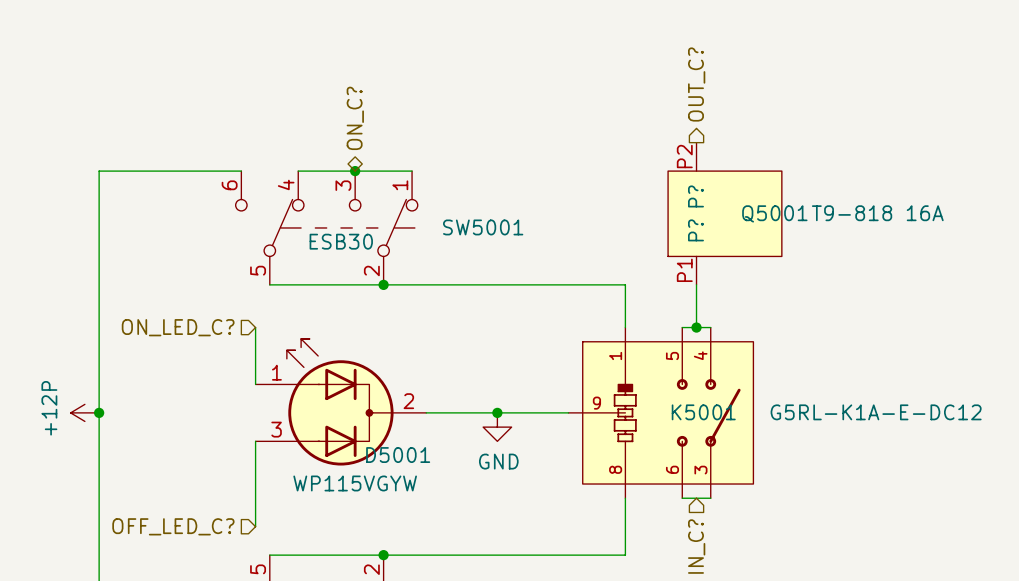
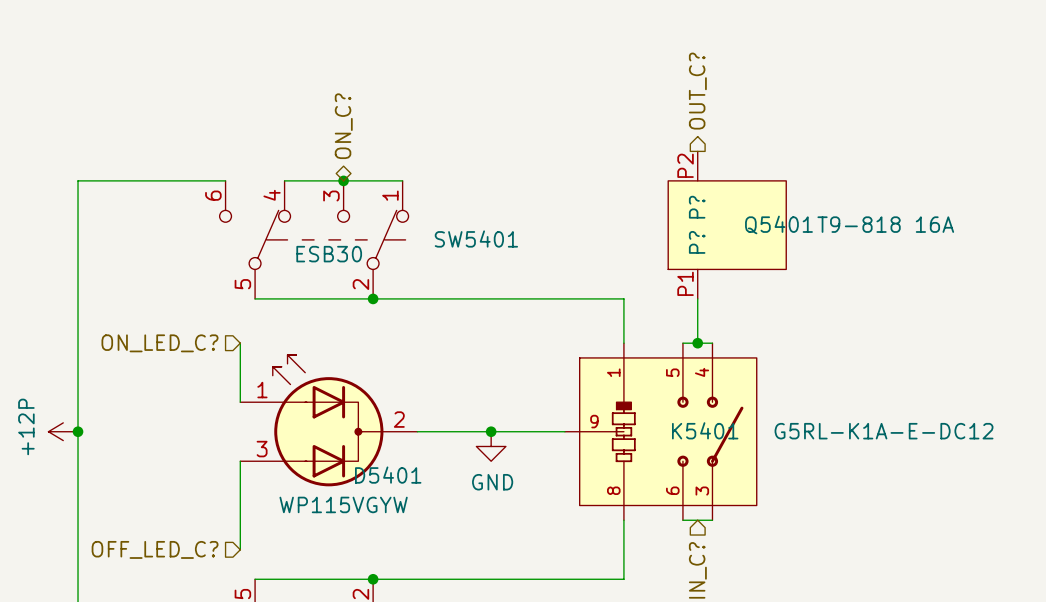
Q5001 name: Q5001 (774, 213) -> Q5401 (778, 224)
SW5001 name: SW5001 (483, 227) -> SW5401 (476, 239)
K5001 name: K5001 (703, 412) -> K5401 (705, 430)
D5001 name: D5001 (398, 455) -> D5401 (388, 475)

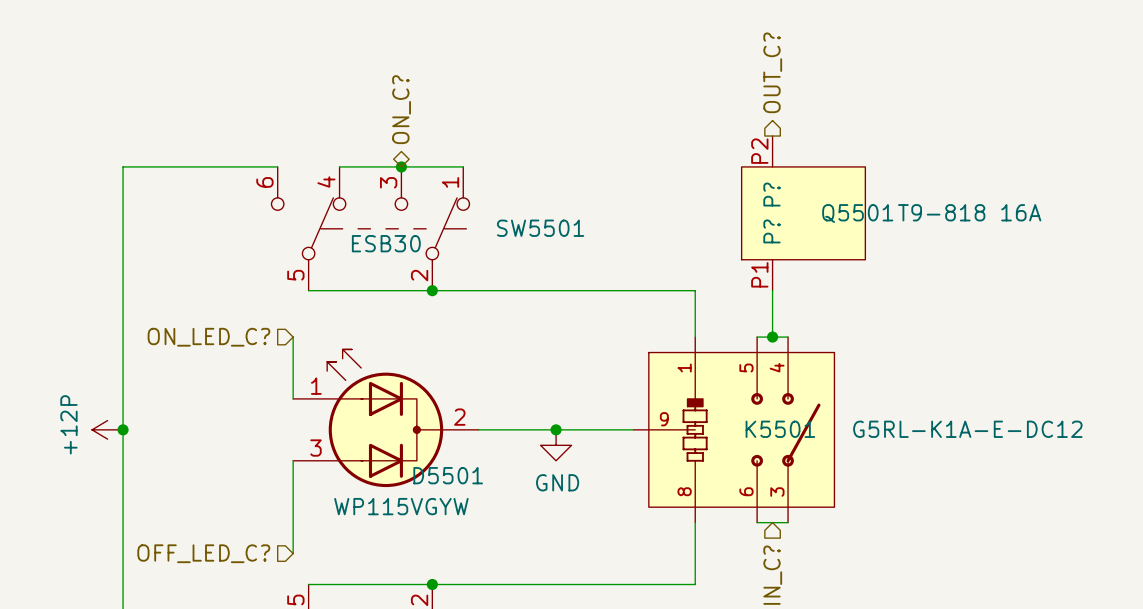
Q5401 name: Q5401 (778, 224) -> Q5501 (857, 213)
SW5401 name: SW5401 (476, 239) -> SW5501 (540, 228)
K5401 name: K5401 (705, 430) -> K5501 (780, 429)
D5401 name: D5401 (388, 475) -> D5501 (448, 475)

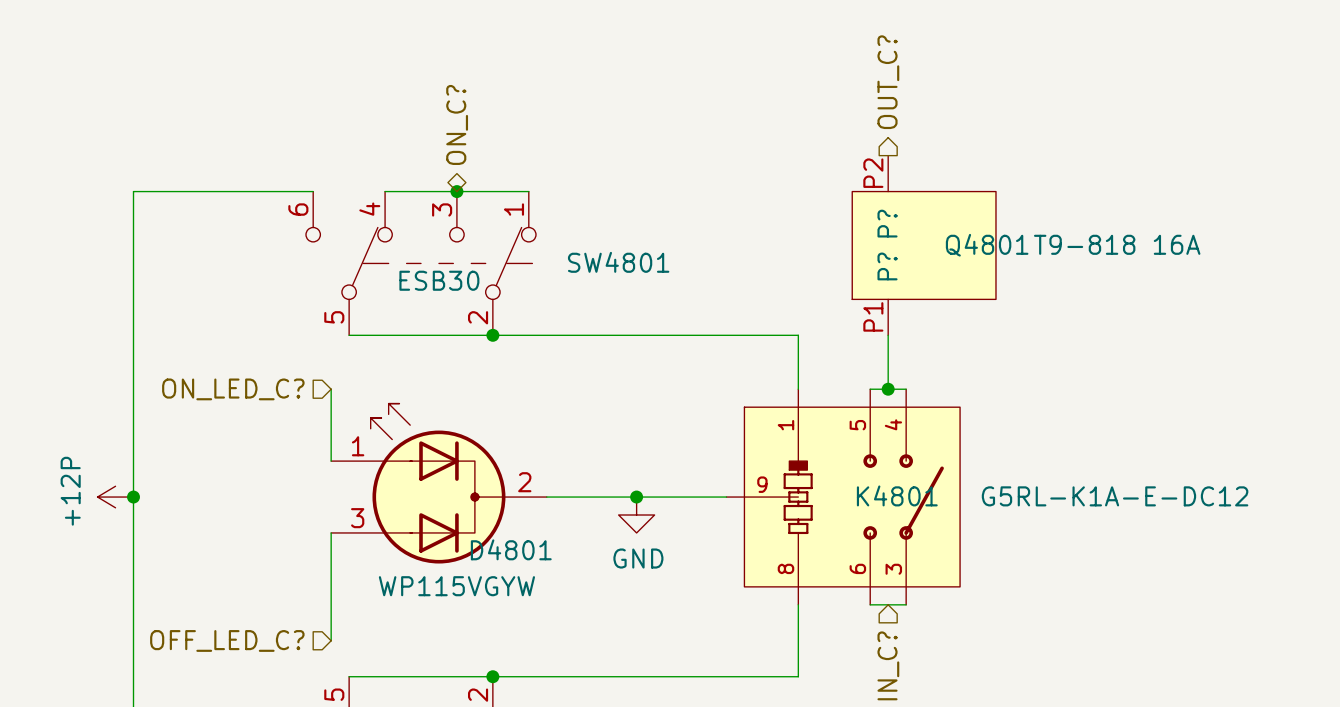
Q5501 name: Q5501 (857, 213) -> Q4801 (987, 245)
SW5501 name: SW5501 (540, 228) -> SW4801 (618, 262)
K5501 name: K5501 (780, 429) -> K4801 (897, 495)
D5501 name: D5501 (448, 475) -> D4801 (511, 549)

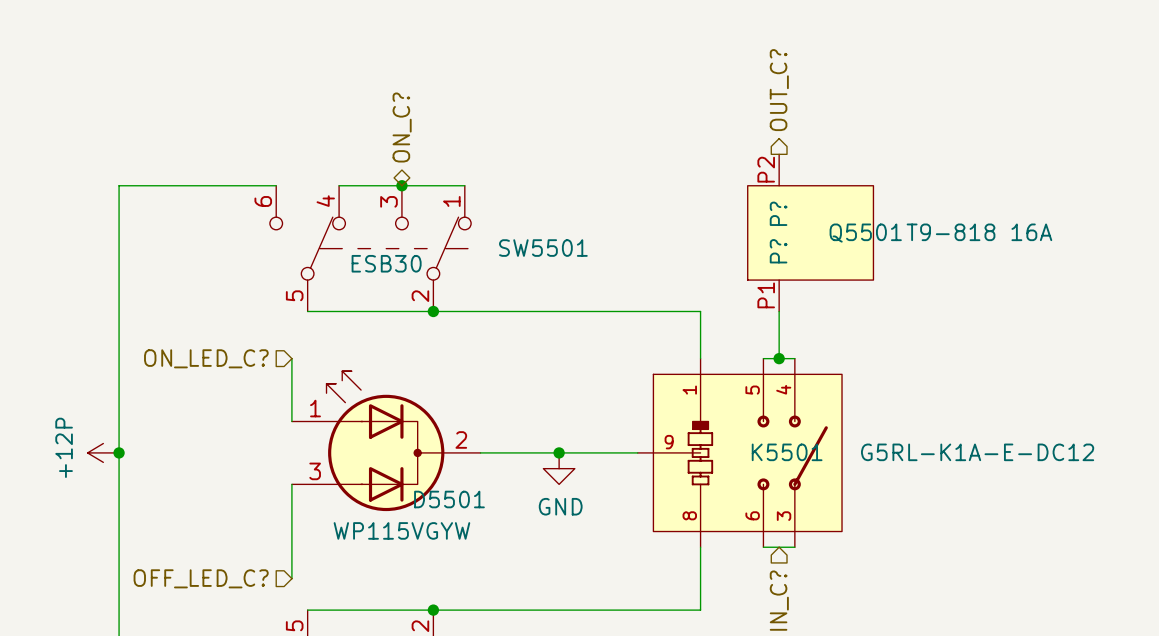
Q4801 name: Q4801 (987, 245) -> Q5501 (865, 233)
SW4801 name: SW4801 (618, 262) -> SW5501 (543, 248)
K4801 name: K4801 (897, 495) -> K5501 (787, 452)
D4801 name: D4801 (511, 549) -> D5501 (449, 499)

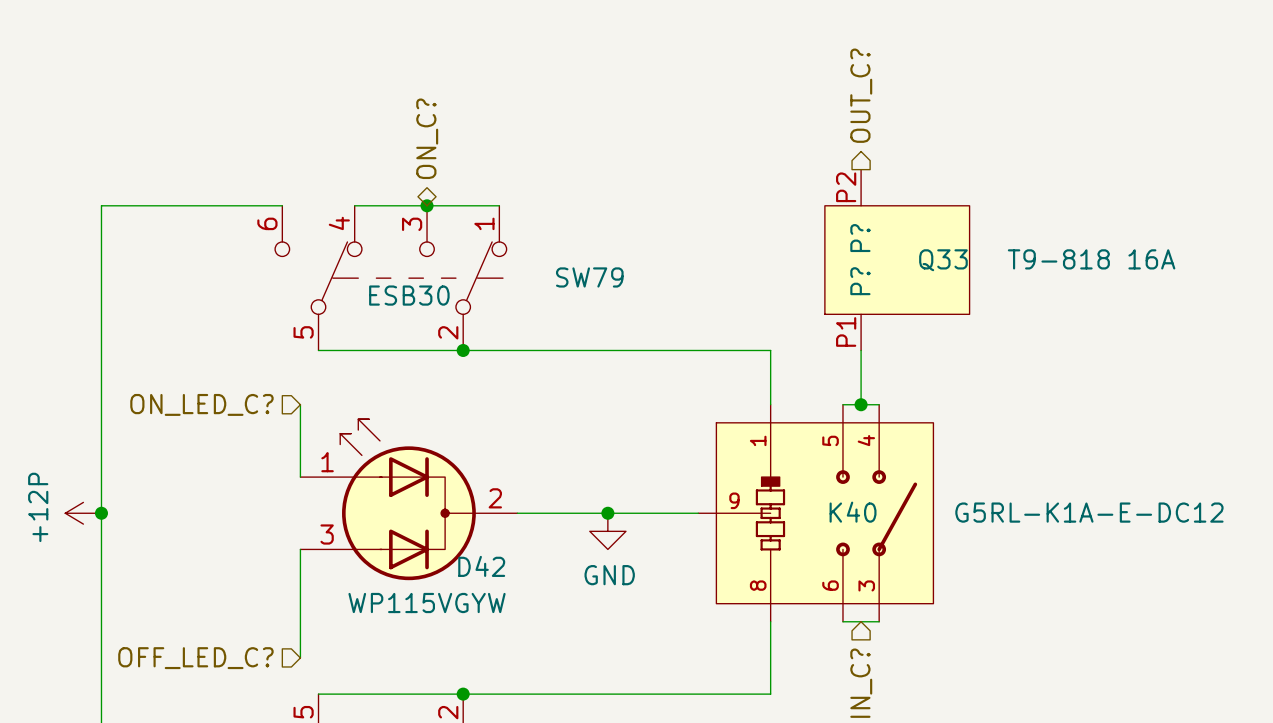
Q5501 name: Q5501 (865, 233) -> Q33 (943, 260)
SW5501 name: SW5501 (543, 248) -> SW79 (589, 277)
K5501 name: K5501 (787, 452) -> K40 (853, 512)
D5501 name: D5501 (449, 499) -> D42 (481, 566)

